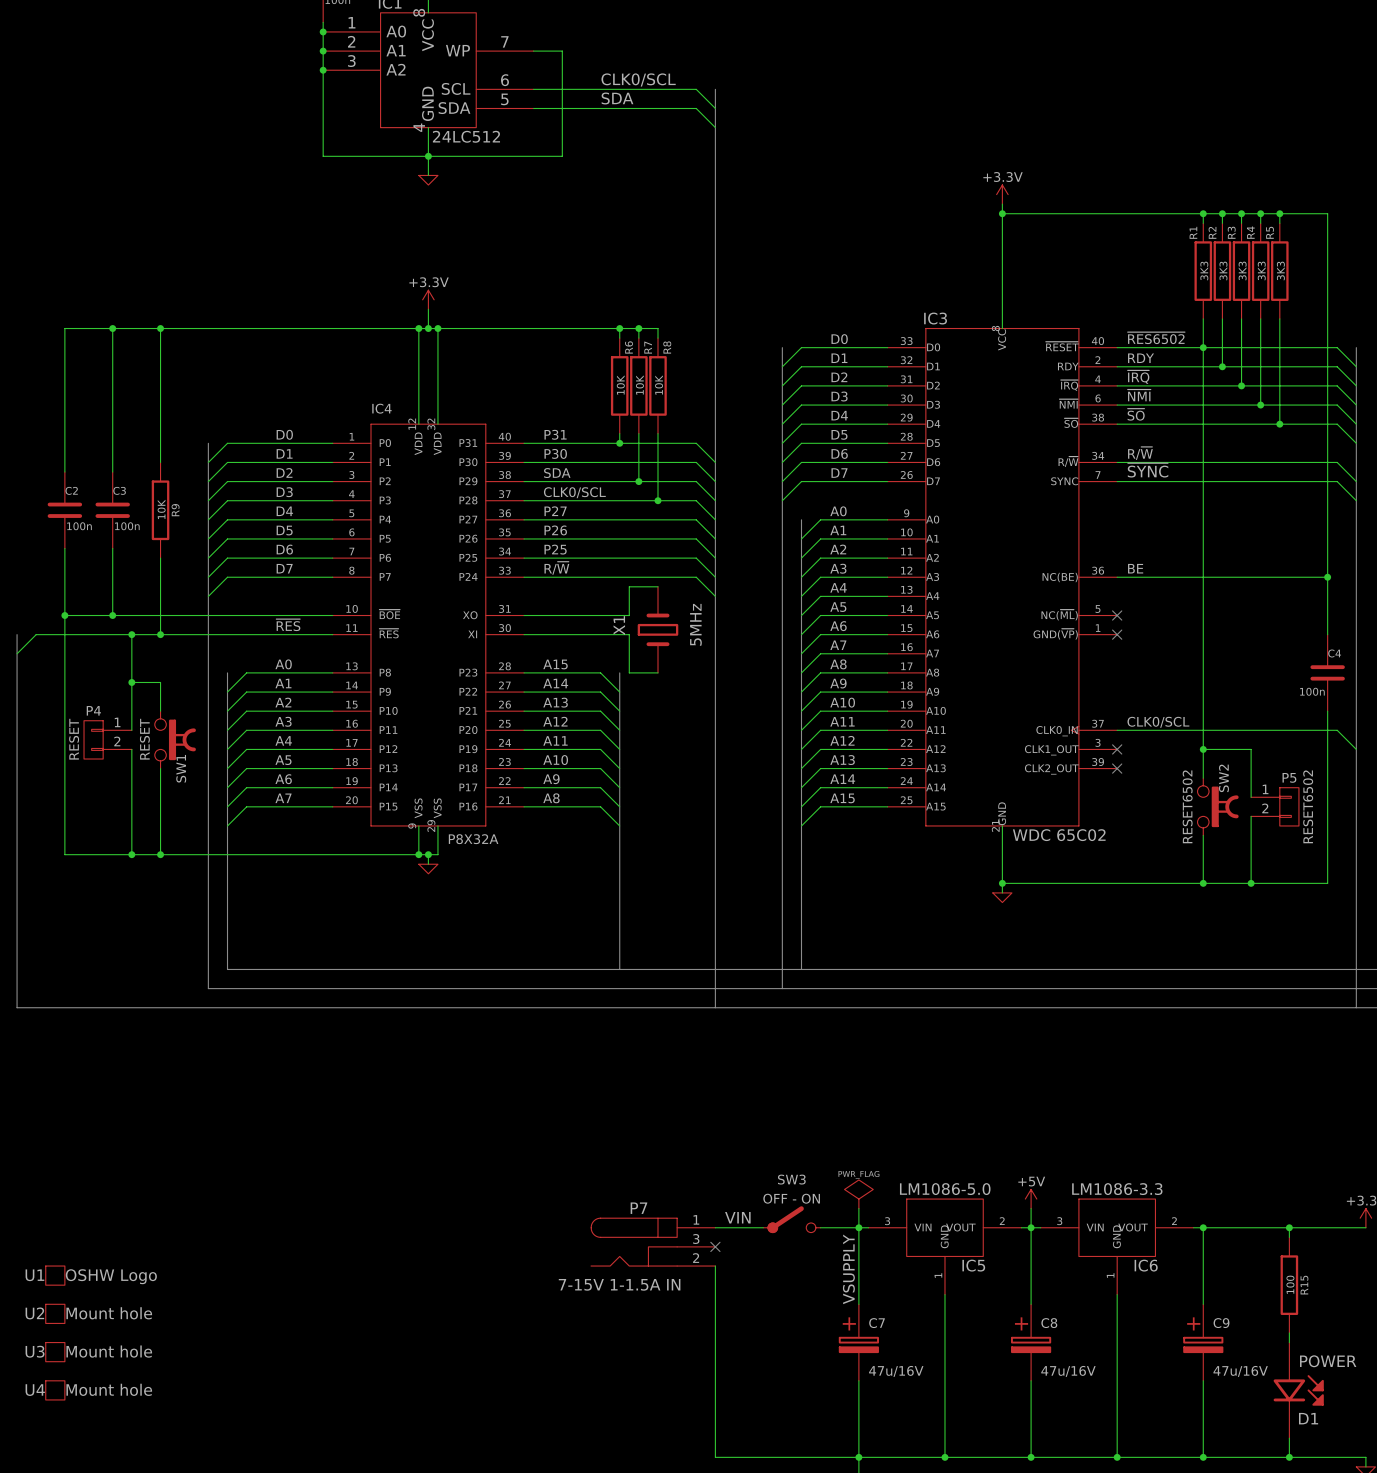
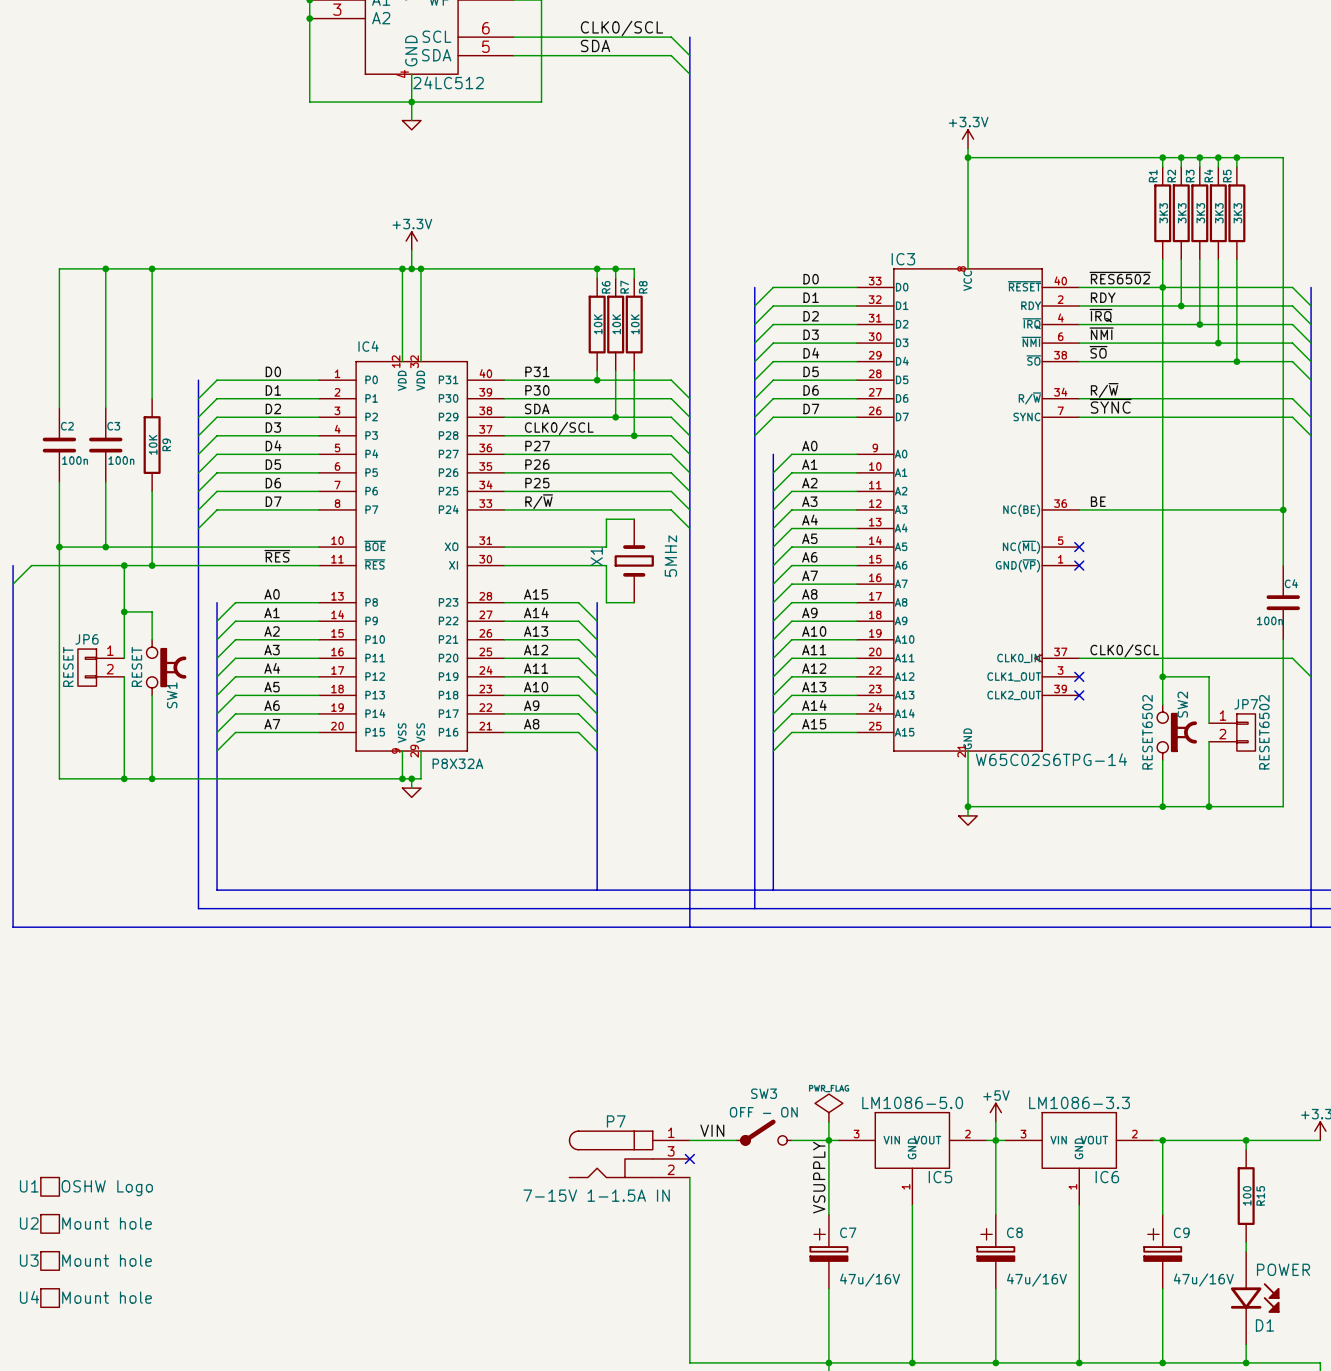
P4 name: P4 (93, 710) -> JP6 (86, 639)
P5 name: P5 (1289, 777) -> JP7 (1246, 704)
IC3 value: WDC 65C02 (1059, 835) -> W65C02S6TPG-14 (1051, 759)

